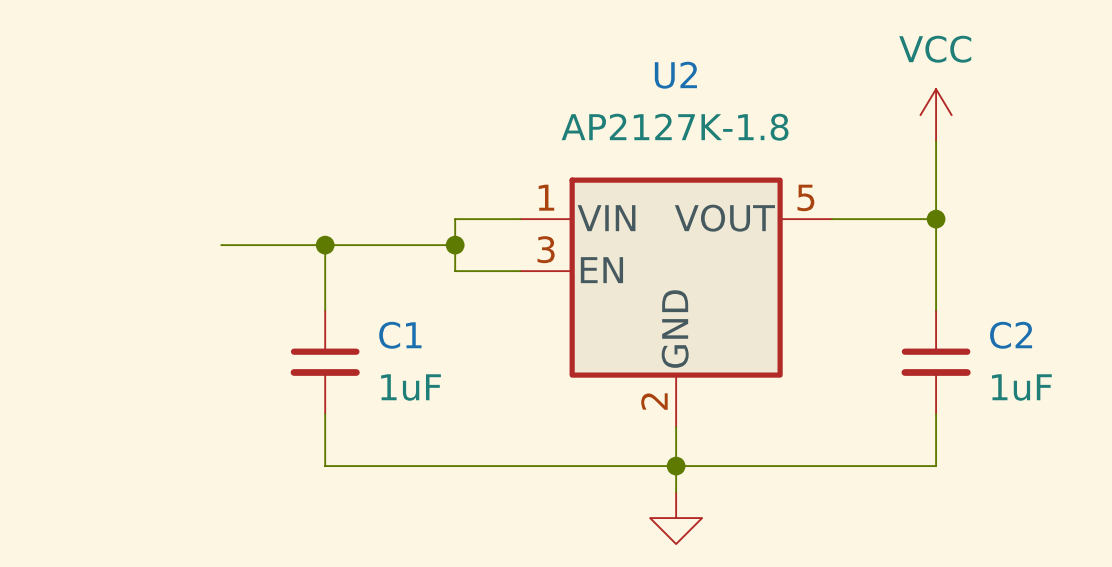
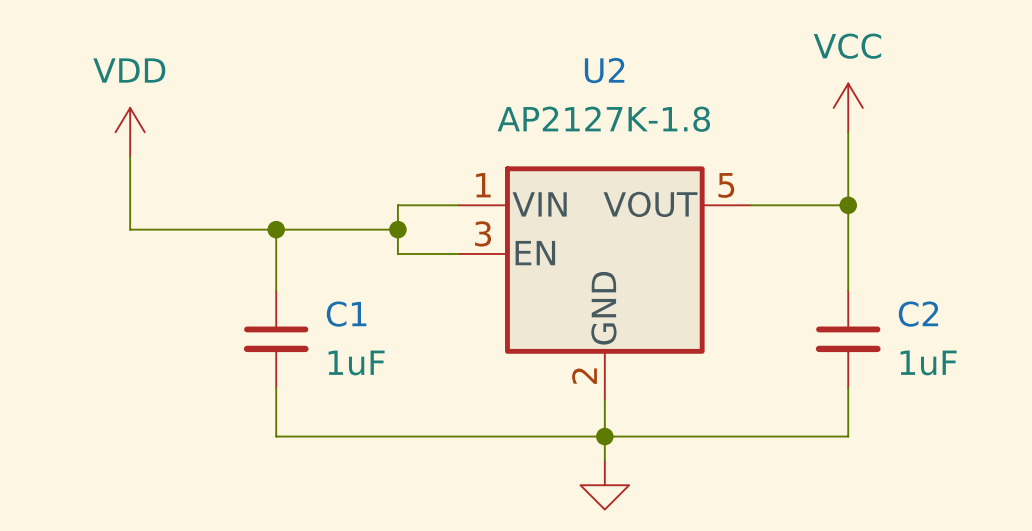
power symbol: none -> VDD (130, 132)
wire: none -> (130, 156) (130, 229) (178, 229)

